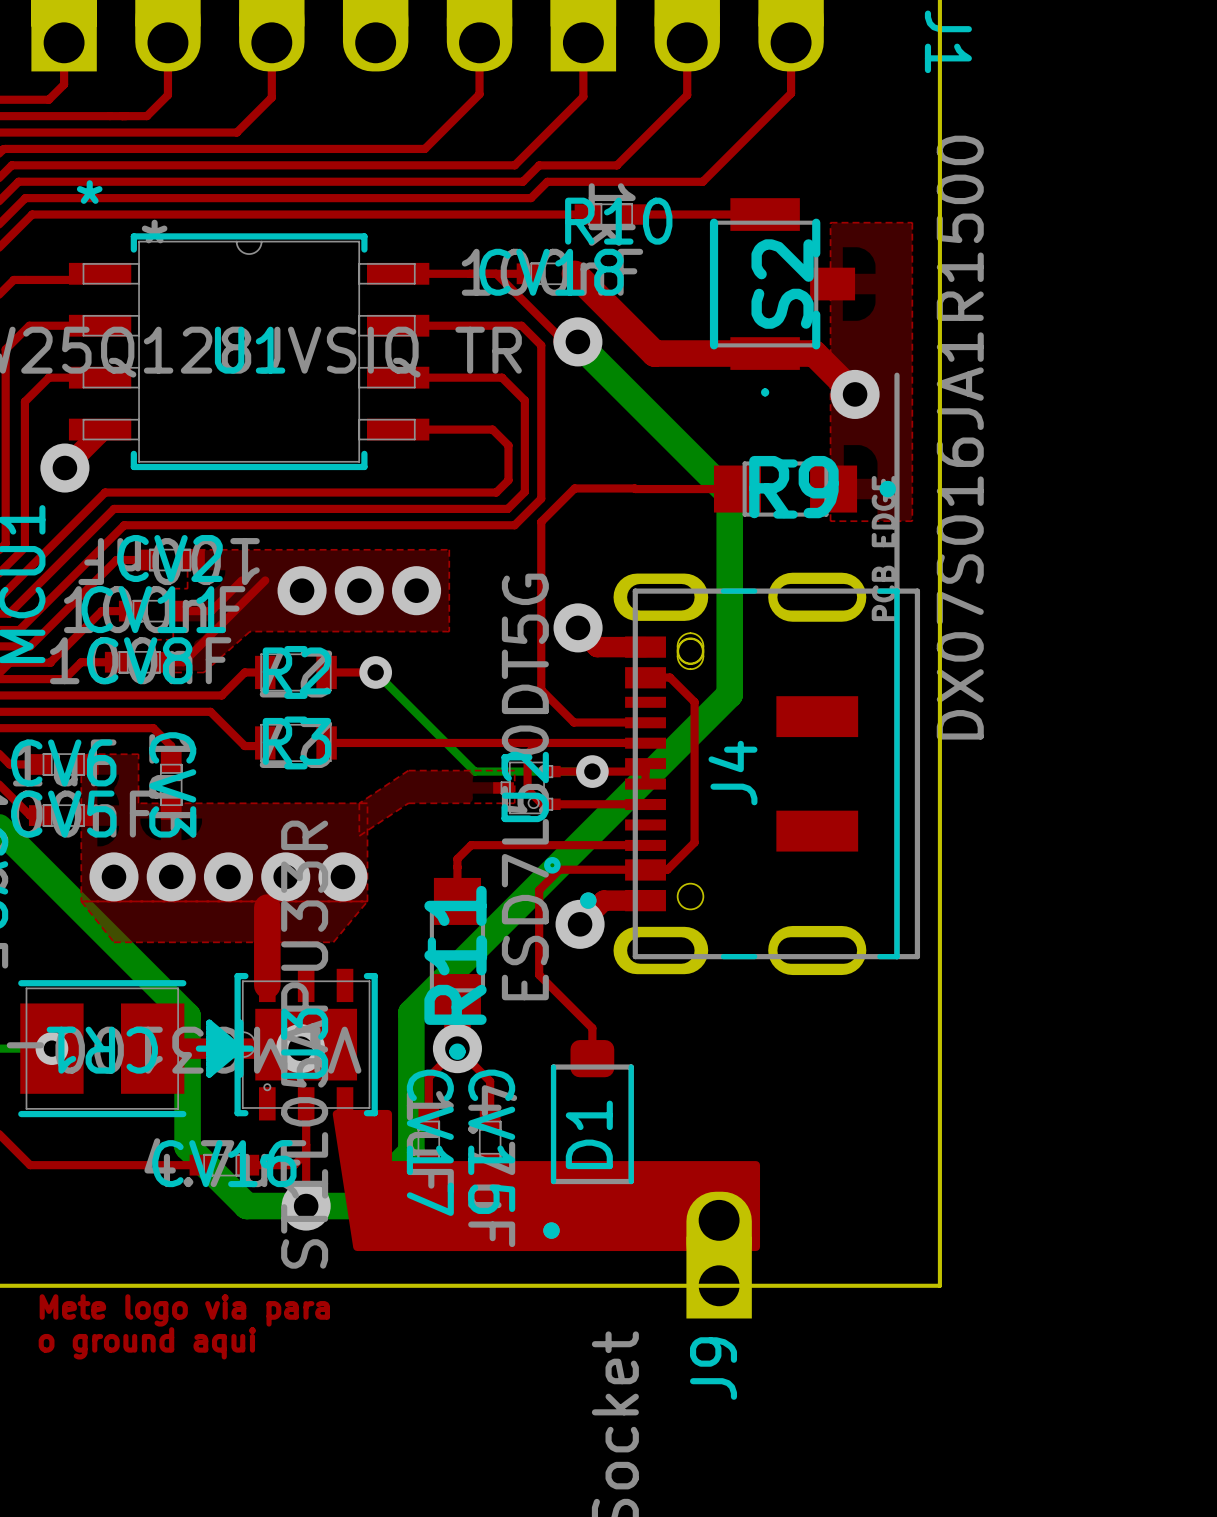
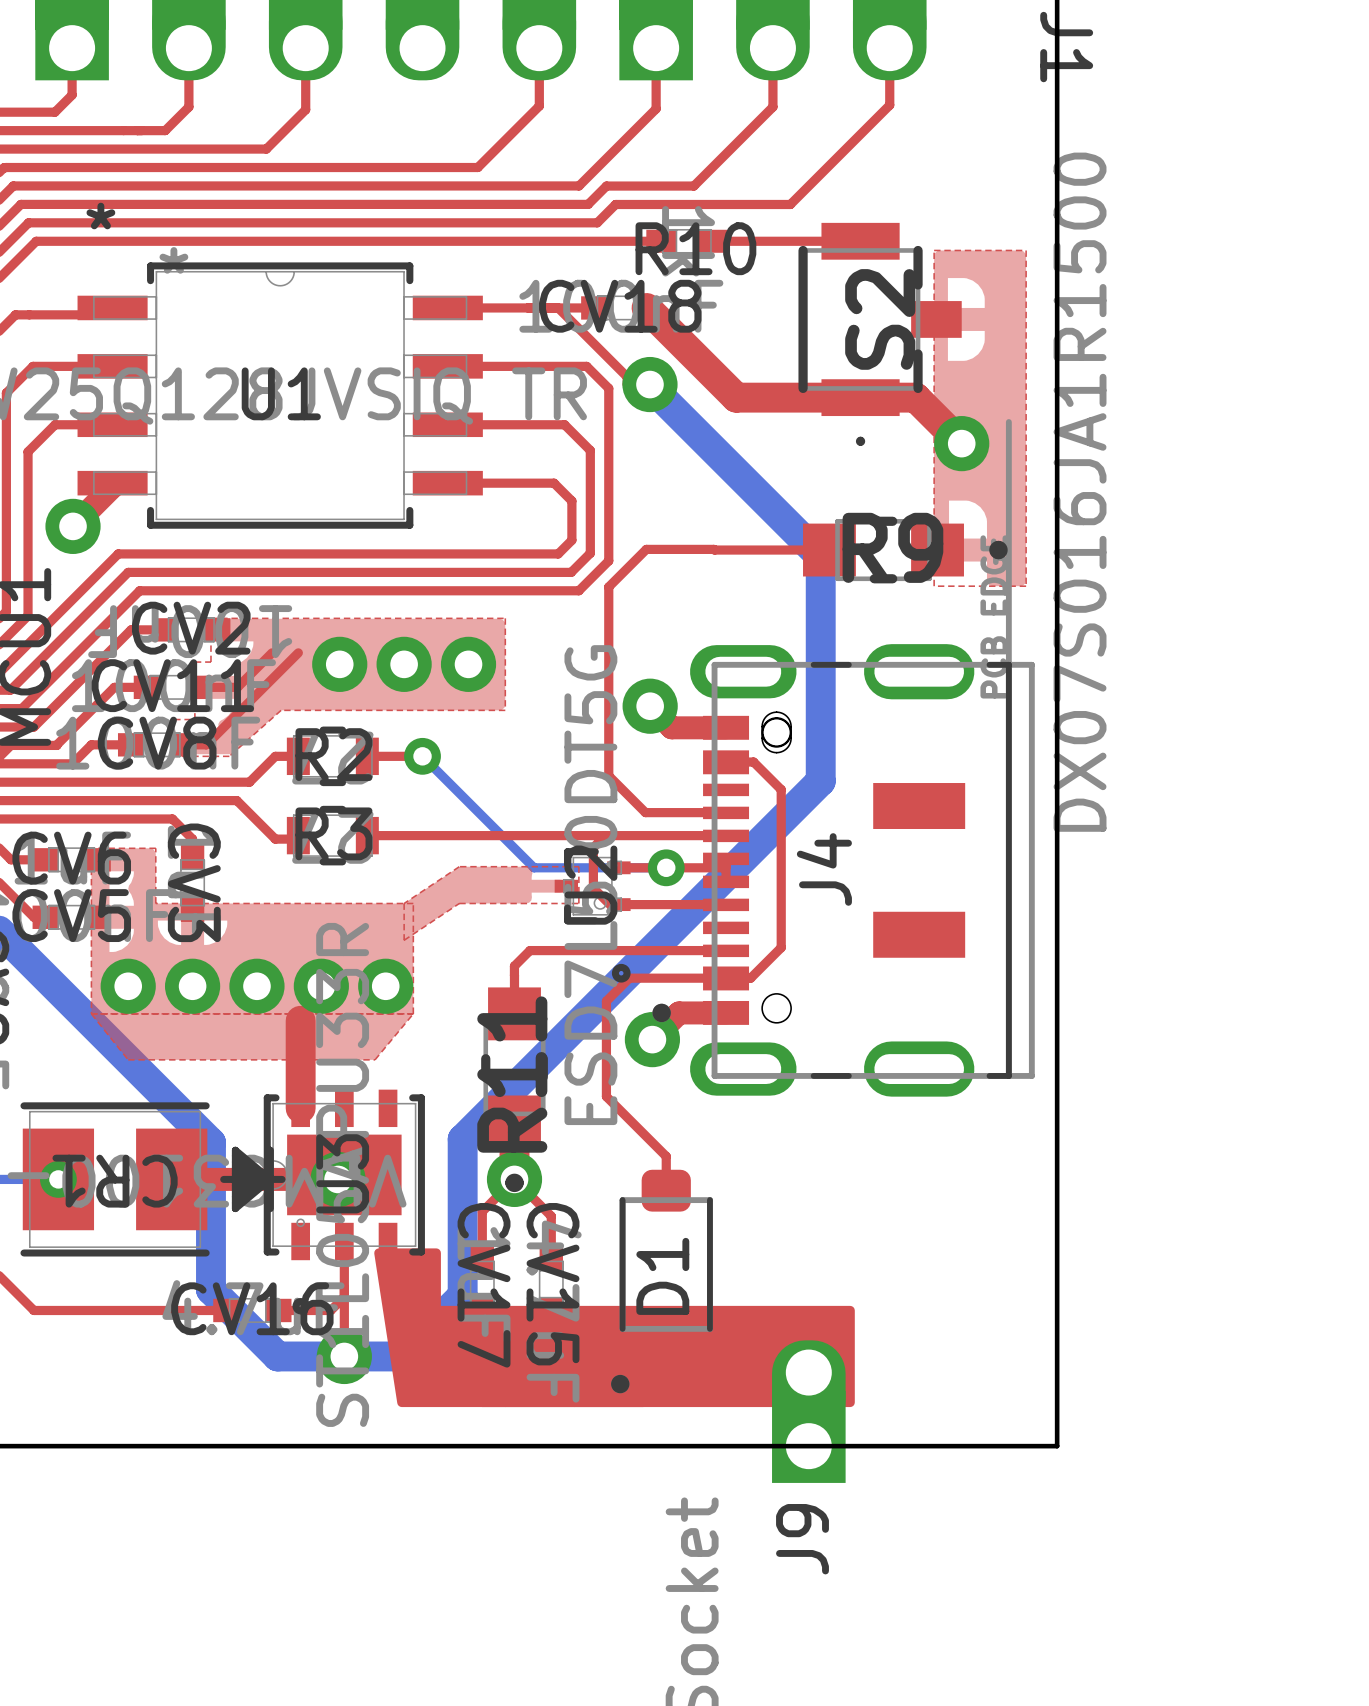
text: Mete logo via para (184, 1310) -> none
text: o ground aqui (147, 1343) -> none

